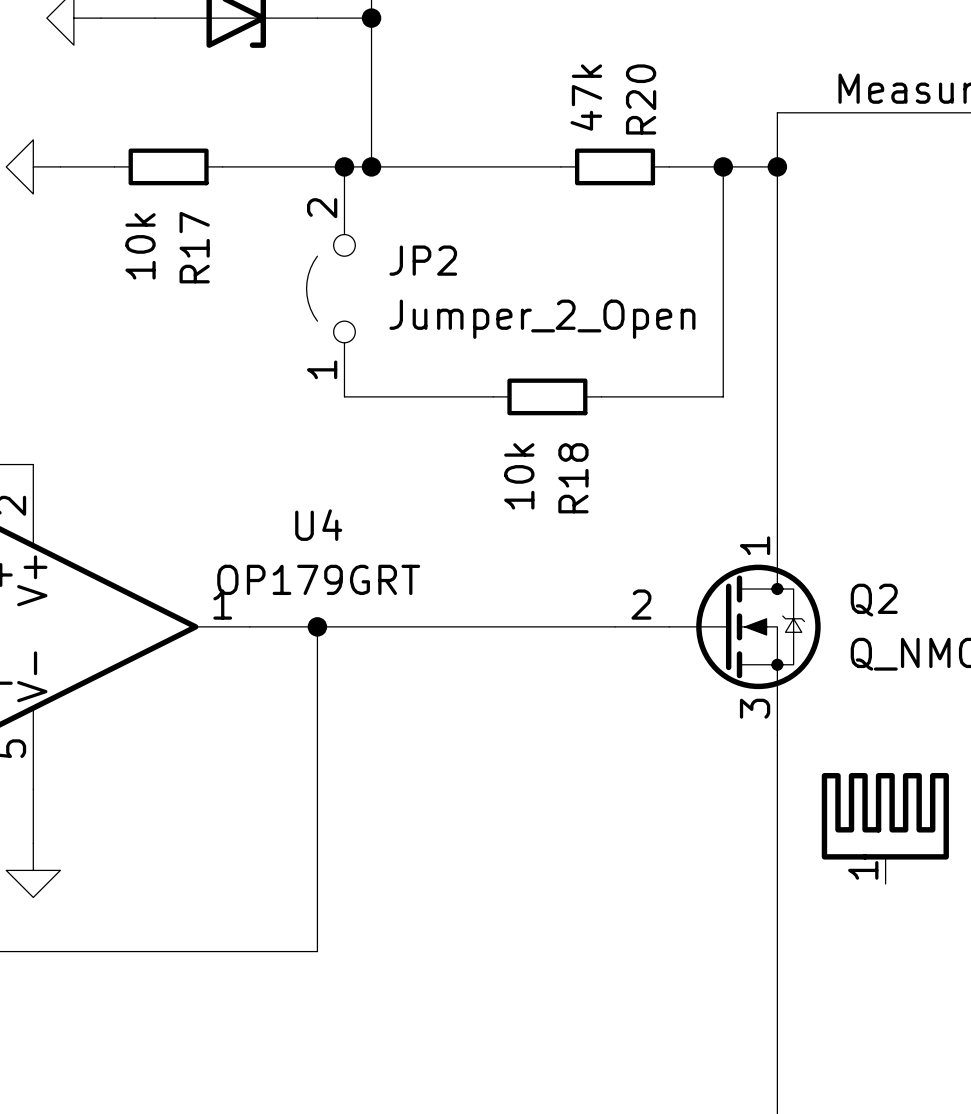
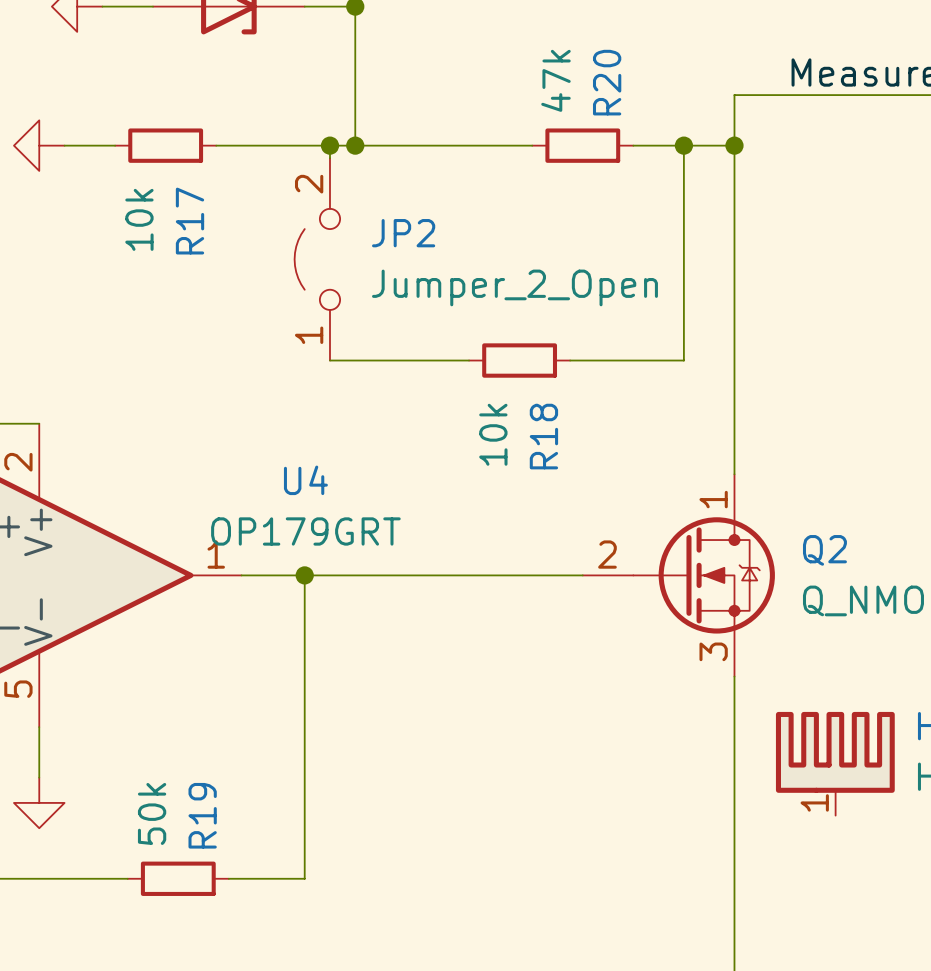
wire: (128, 951) (236, 951) -> none
R19: none -> 50k (178, 878)

